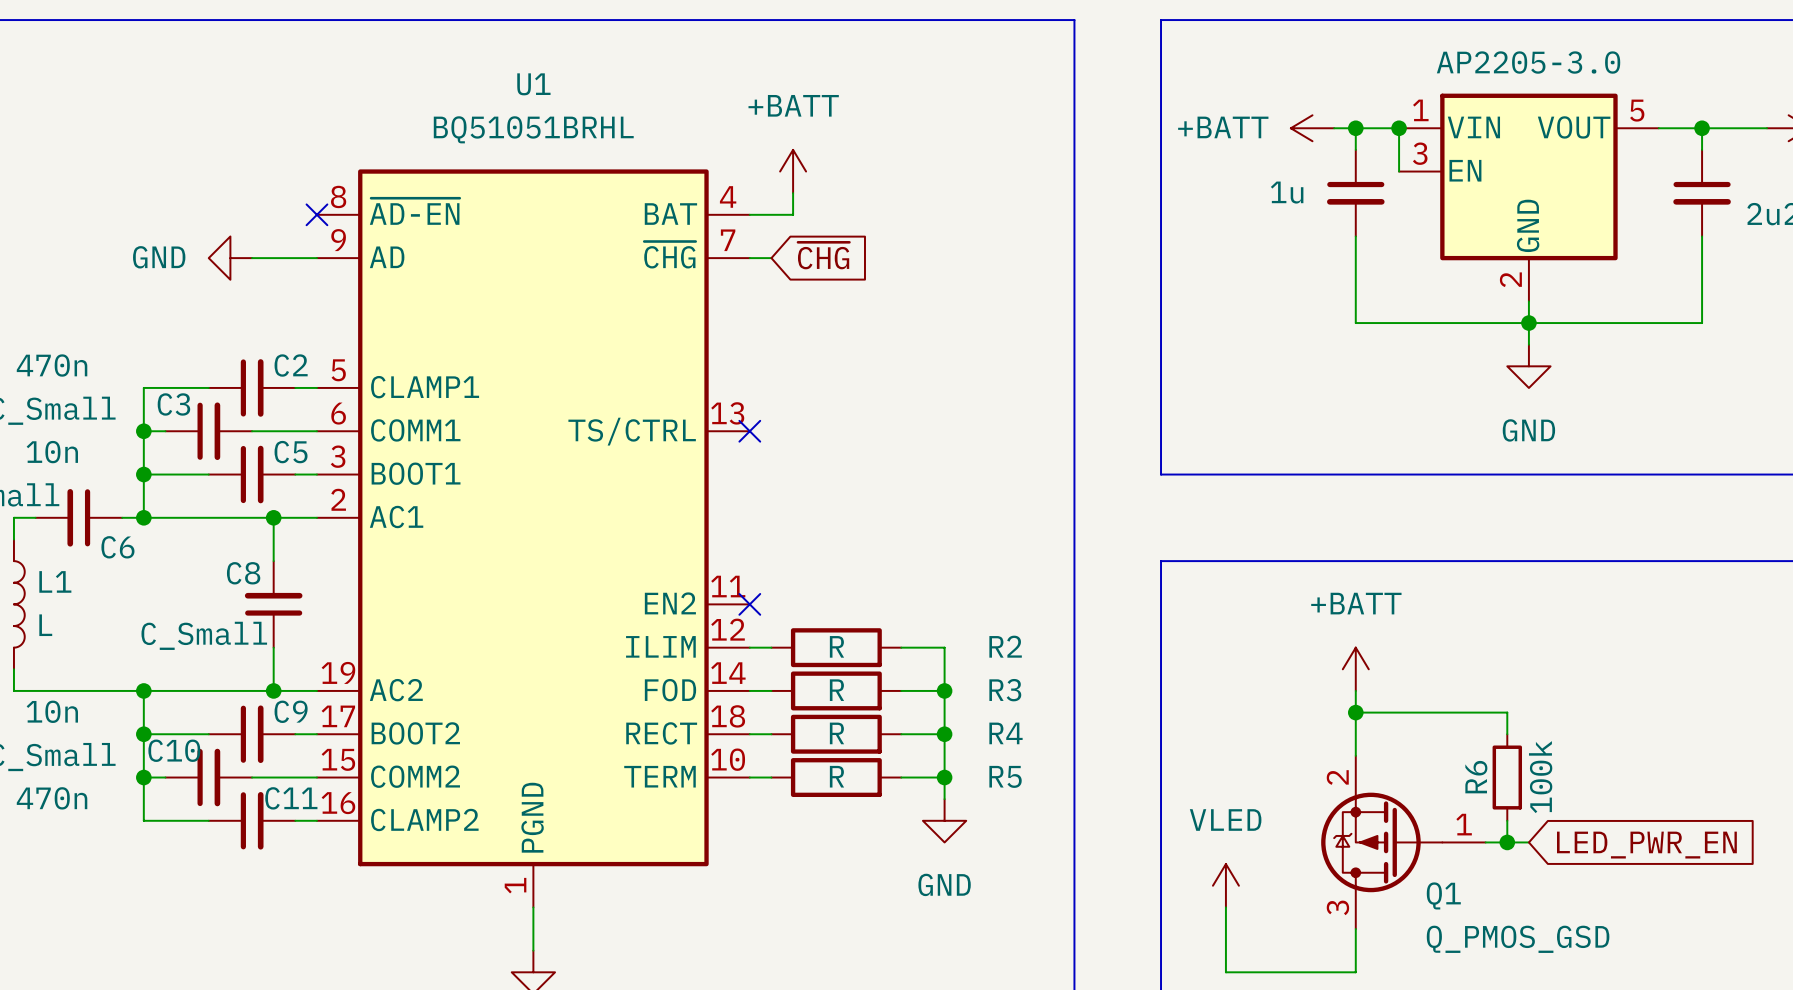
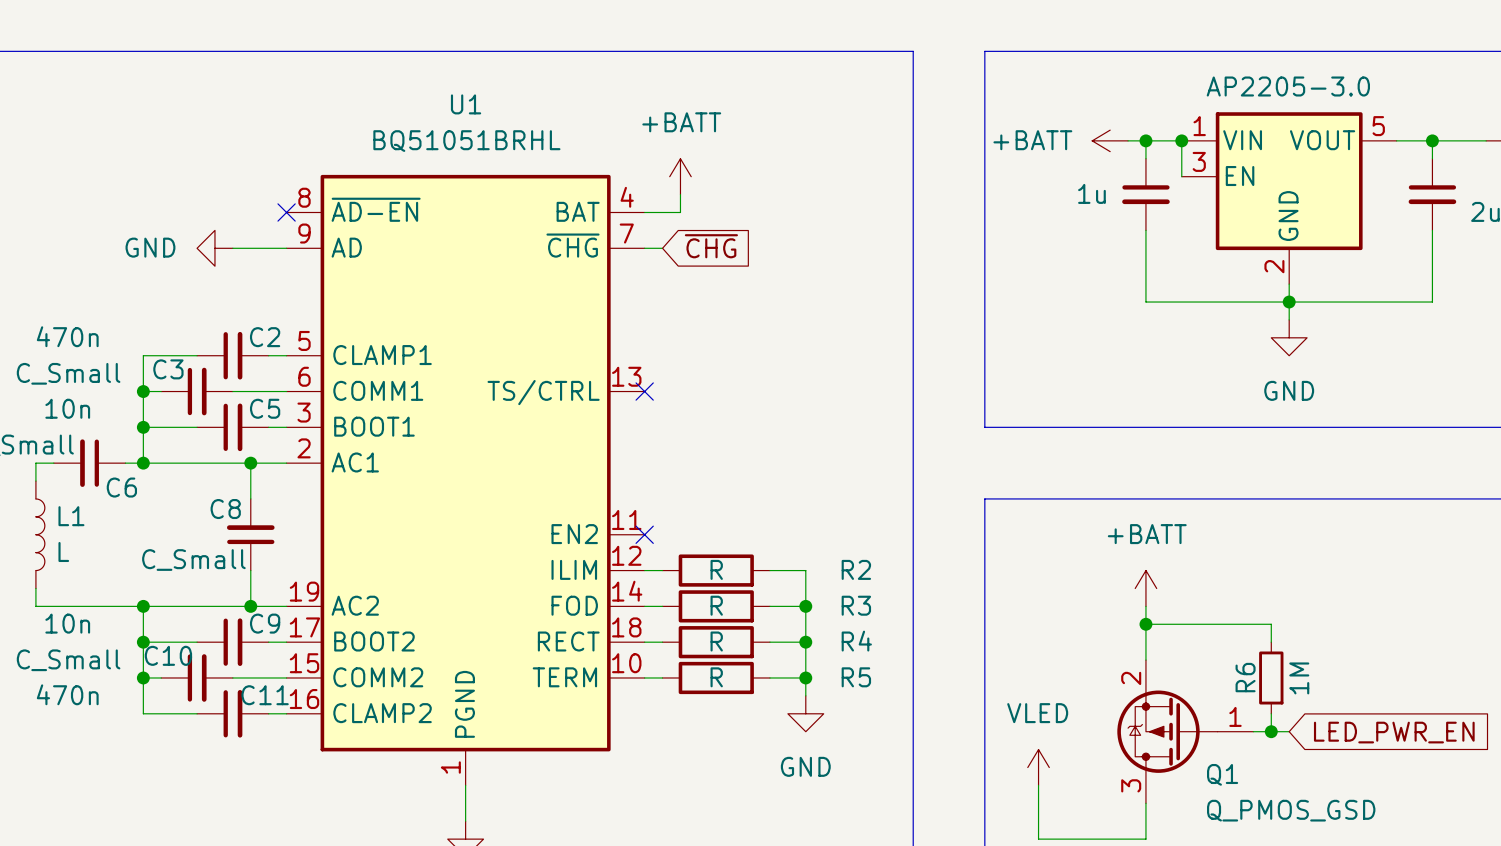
R6 value: 100k (1540, 777) -> 1M (1299, 678)

